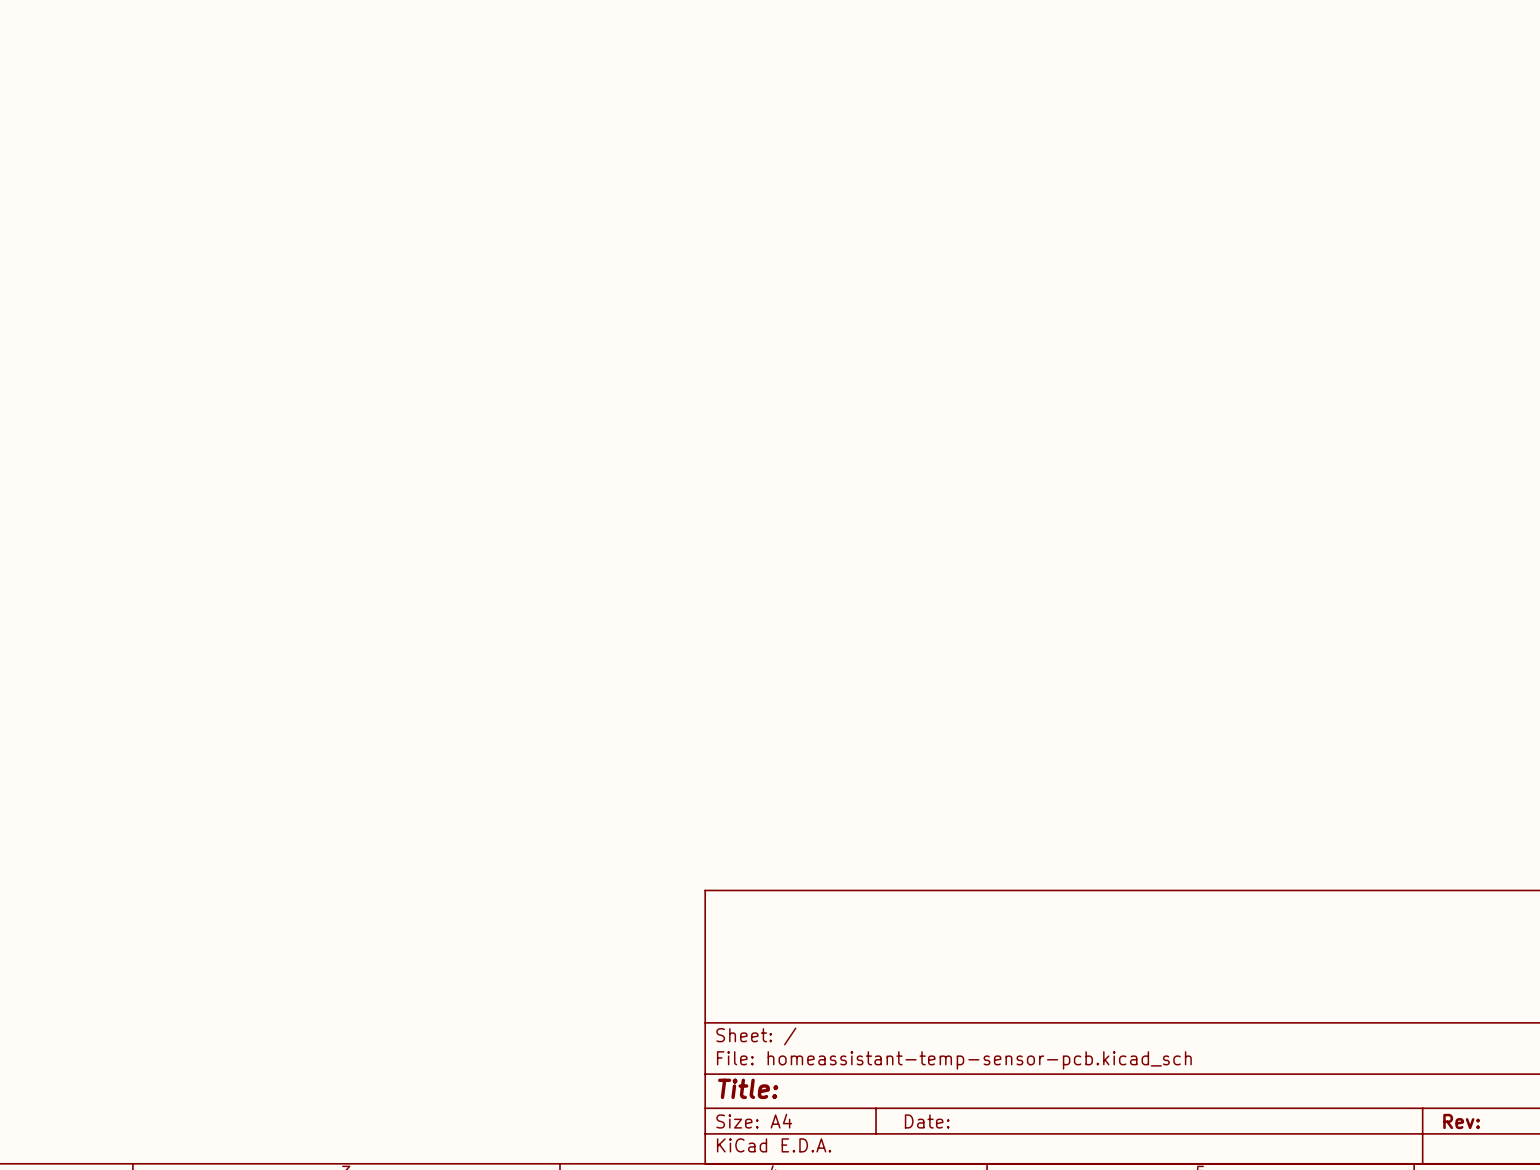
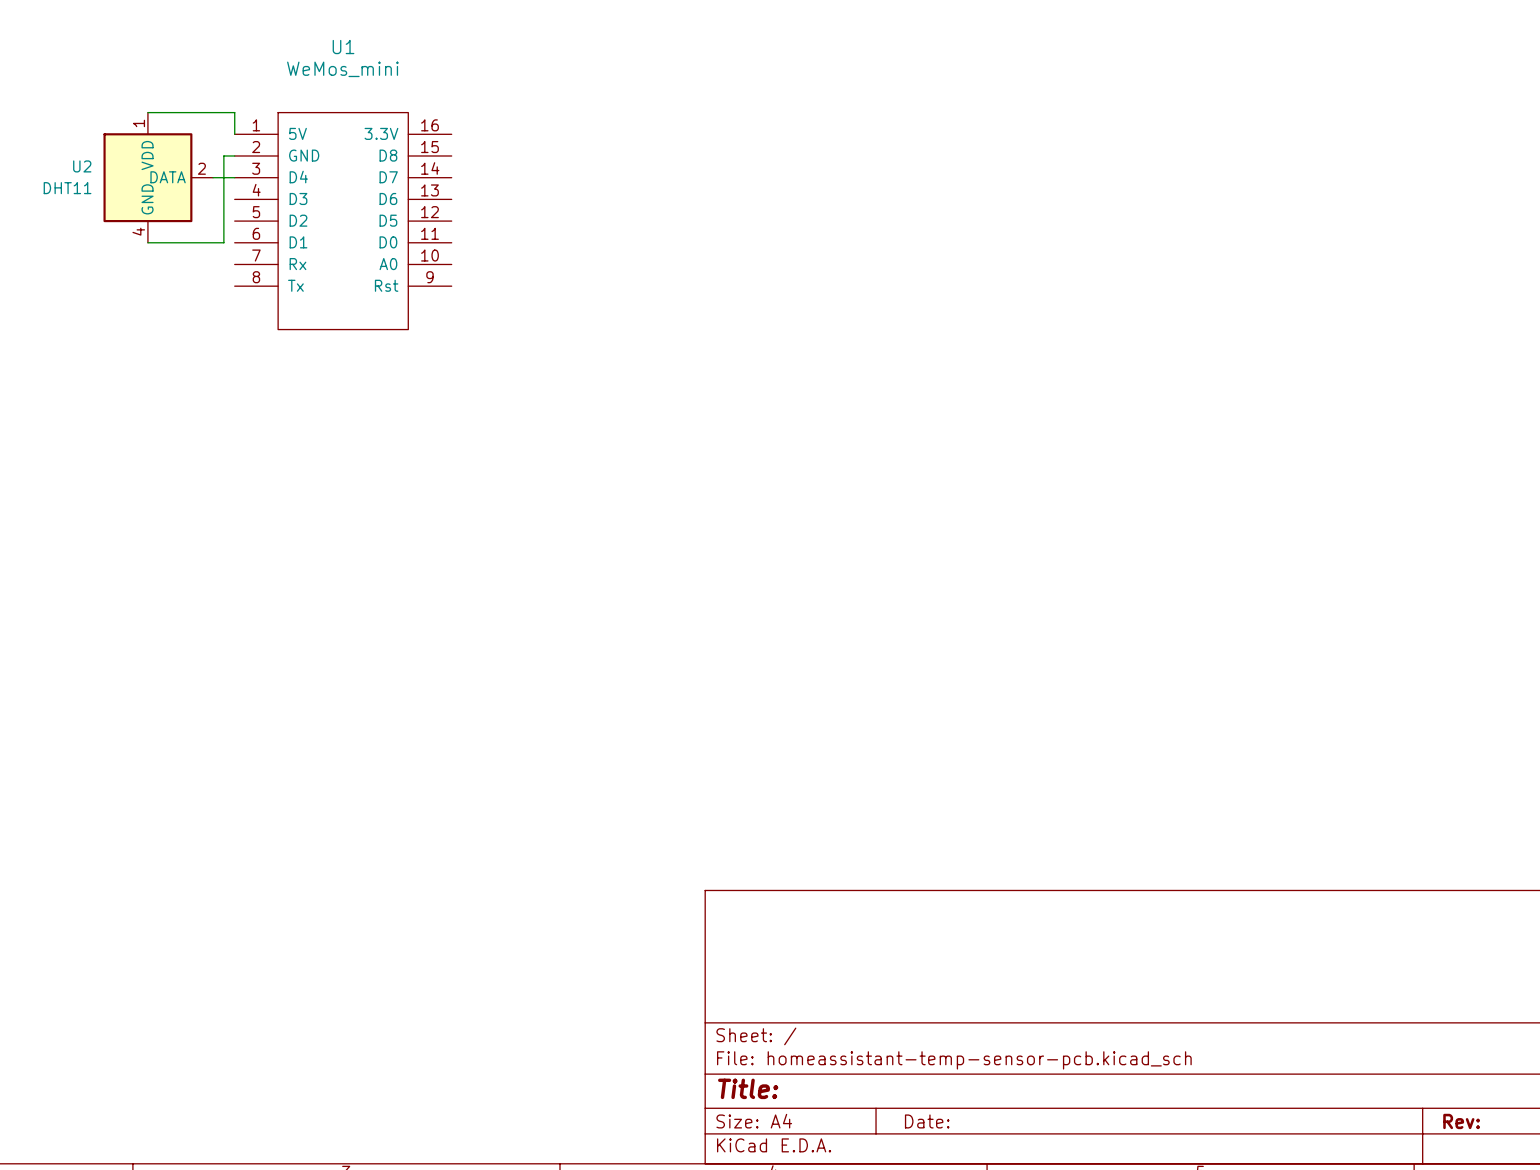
wire: none -> (147, 112) (234, 112) (234, 134)
wire: none -> (234, 155) (223, 155) (223, 242) (147, 242)
U2: none -> DHT11 (158, 177)
wire: none -> (213, 177) (234, 177)
U1: none -> WeMos_mini (343, 221)

